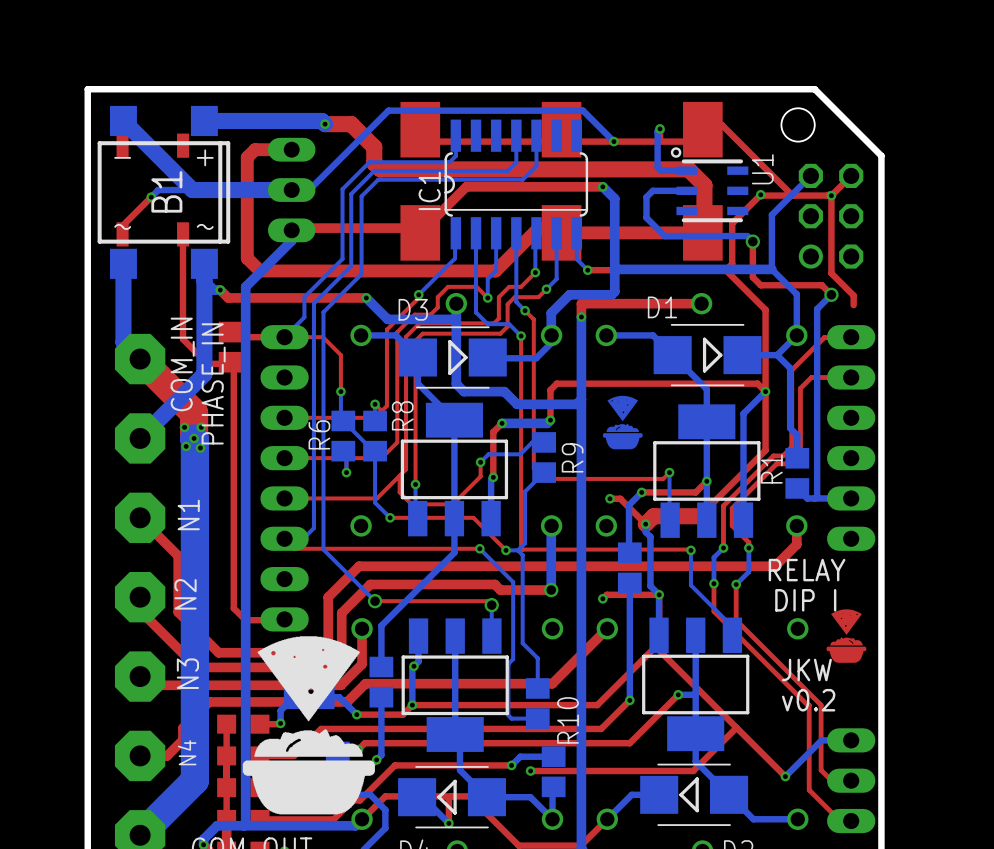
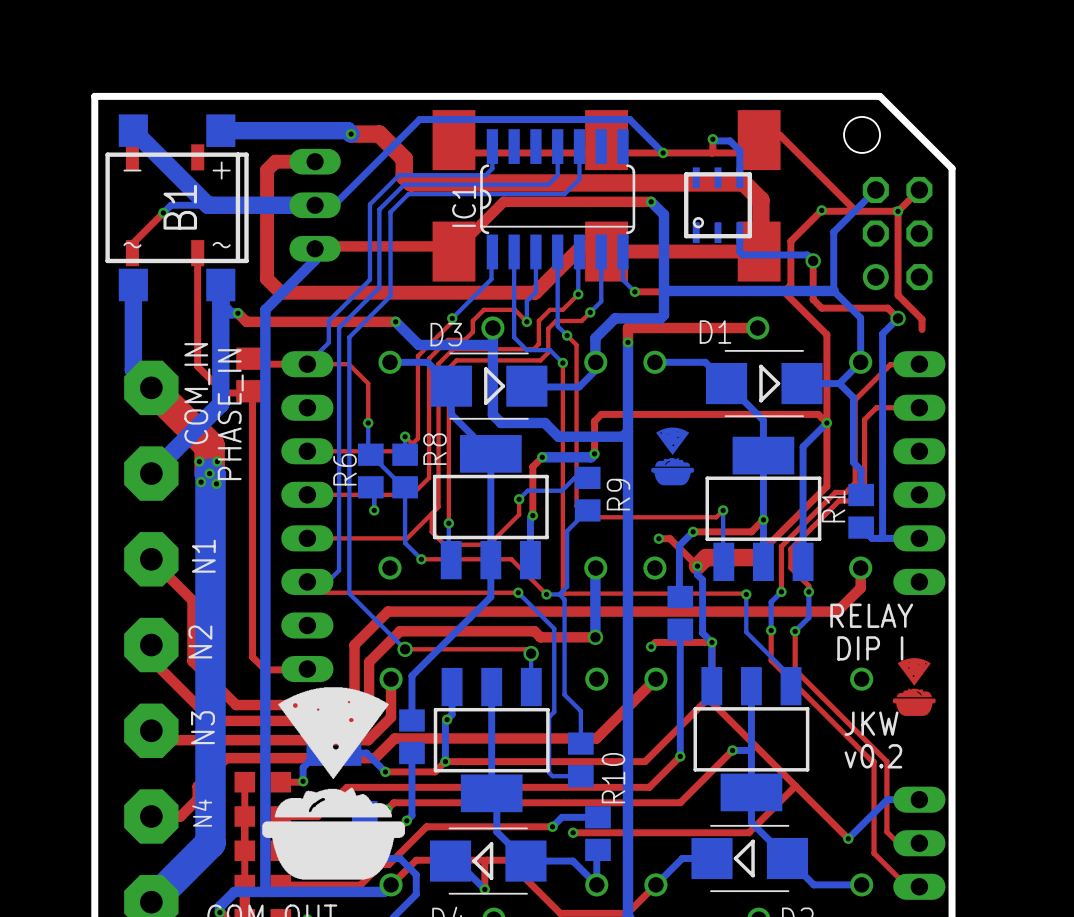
bottom track: (659, 128) (657, 131) (657, 167) (661, 170) (686, 170) -> none
bottom track: none -> (714, 140) (730, 140) (739, 150) (739, 177)
U1: (709, 184) -> none
part: none -> (718, 205)
bottom track: (686, 190) (652, 190) (646, 197) (646, 217) (664, 236) (687, 236) -> (739, 232) (739, 251) (742, 254)

